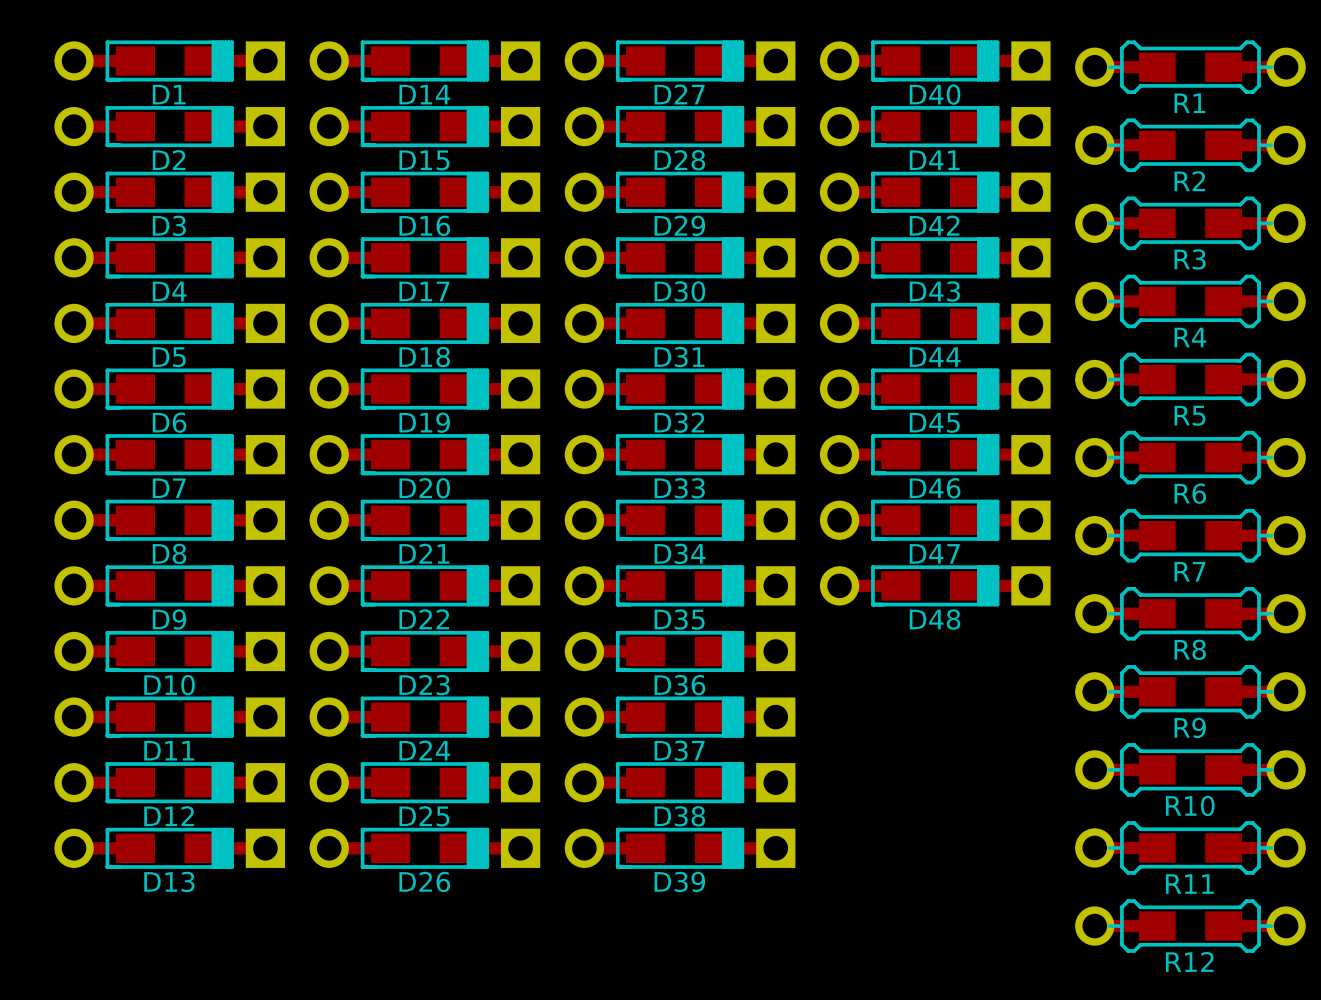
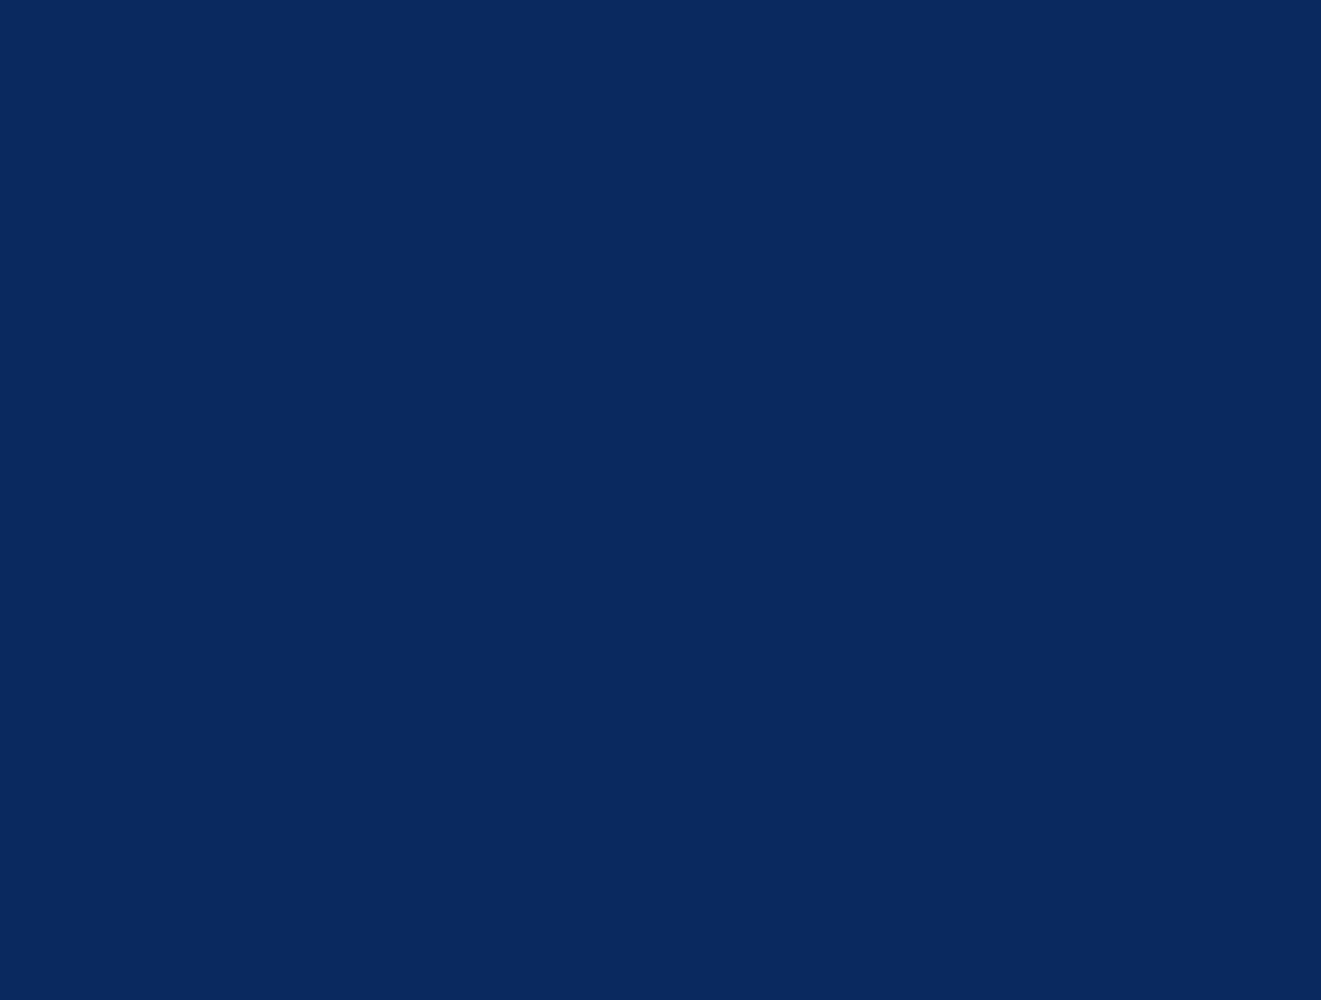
D1: (169, 60) -> none
D14: (424, 60) -> none
D27: (680, 60) -> none
D40: (935, 60) -> none
R1: (1190, 67) -> none
D2: (169, 126) -> none
D15: (424, 126) -> none
D28: (680, 126) -> none
D41: (935, 126) -> none
R2: (1190, 145) -> none
D3: (169, 192) -> none
D16: (424, 192) -> none
D29: (680, 192) -> none
D42: (935, 192) -> none
R3: (1190, 223) -> none
D4: (169, 257) -> none
D17: (424, 257) -> none
D30: (680, 257) -> none
D43: (935, 257) -> none
R4: (1190, 301) -> none
D5: (169, 323) -> none
D18: (424, 323) -> none
D31: (680, 323) -> none
D44: (935, 323) -> none
R5: (1190, 379) -> none
D6: (169, 389) -> none
D19: (424, 389) -> none
D32: (680, 389) -> none
D45: (935, 389) -> none
D7: (169, 454) -> none
D20: (424, 454) -> none
D33: (680, 454) -> none
D46: (935, 454) -> none
R6: (1190, 457) -> none
D8: (169, 520) -> none
D21: (424, 520) -> none
D34: (680, 520) -> none
D47: (935, 520) -> none
R7: (1190, 535) -> none
D9: (169, 585) -> none
D22: (424, 585) -> none
D35: (680, 585) -> none
D48: (935, 585) -> none
R8: (1190, 613) -> none
D10: (169, 651) -> none
D23: (424, 651) -> none
D36: (680, 651) -> none
R9: (1190, 691) -> none
D11: (169, 717) -> none
D24: (424, 717) -> none
D37: (680, 717) -> none
R10: (1190, 769) -> none
D12: (169, 782) -> none
D25: (424, 782) -> none
D38: (680, 782) -> none
R11: (1190, 847) -> none
D13: (169, 848) -> none
D26: (424, 848) -> none
D39: (680, 848) -> none
R12: (1190, 926) -> none

